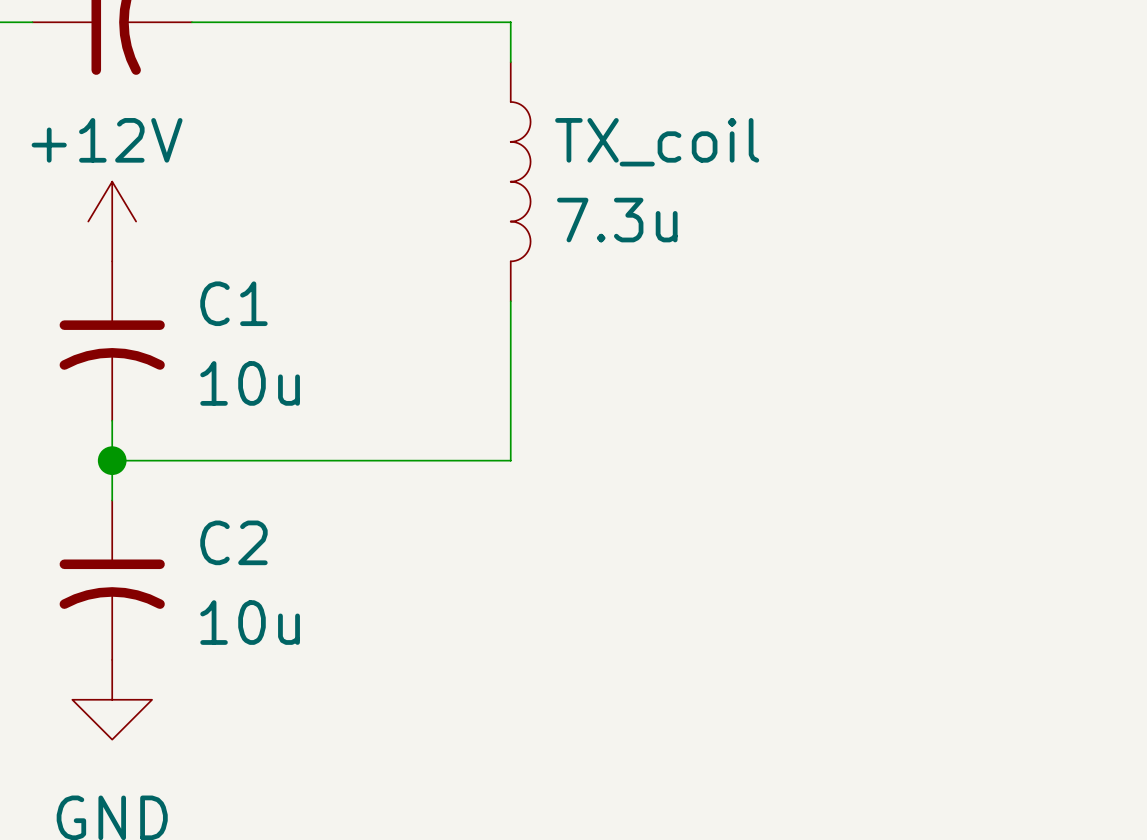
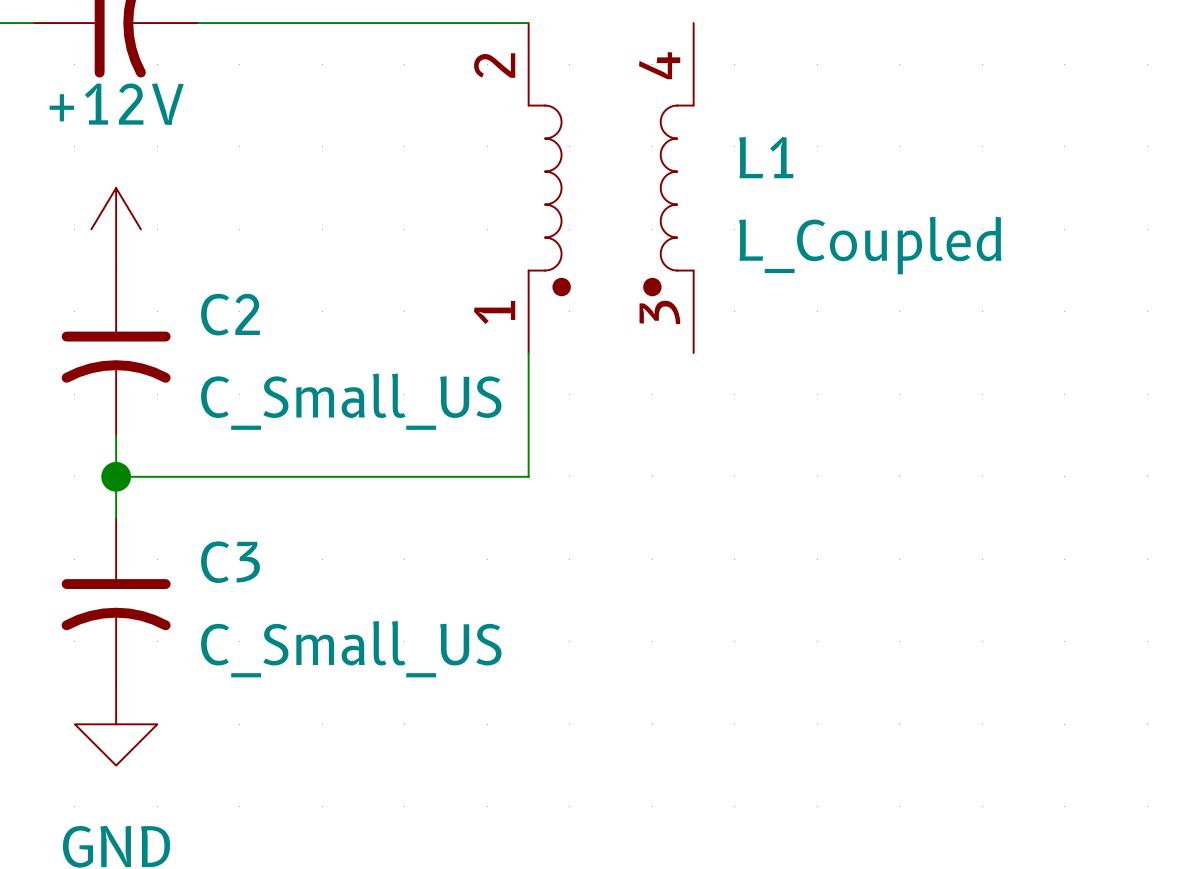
power symbol text position: +12V (107, 140) -> +12V (116, 104)
TX_coil: 7.3u (520, 181) -> none
L1: none -> L_Coupled (611, 188)
C1 name: C1 (233, 303) -> C2 (230, 314)
C1 value: 10u (250, 383) -> C_Small_US (351, 401)
C2 name: C2 (233, 542) -> C3 (230, 562)
C2 value: 10u (250, 622) -> C_Small_US (351, 649)

